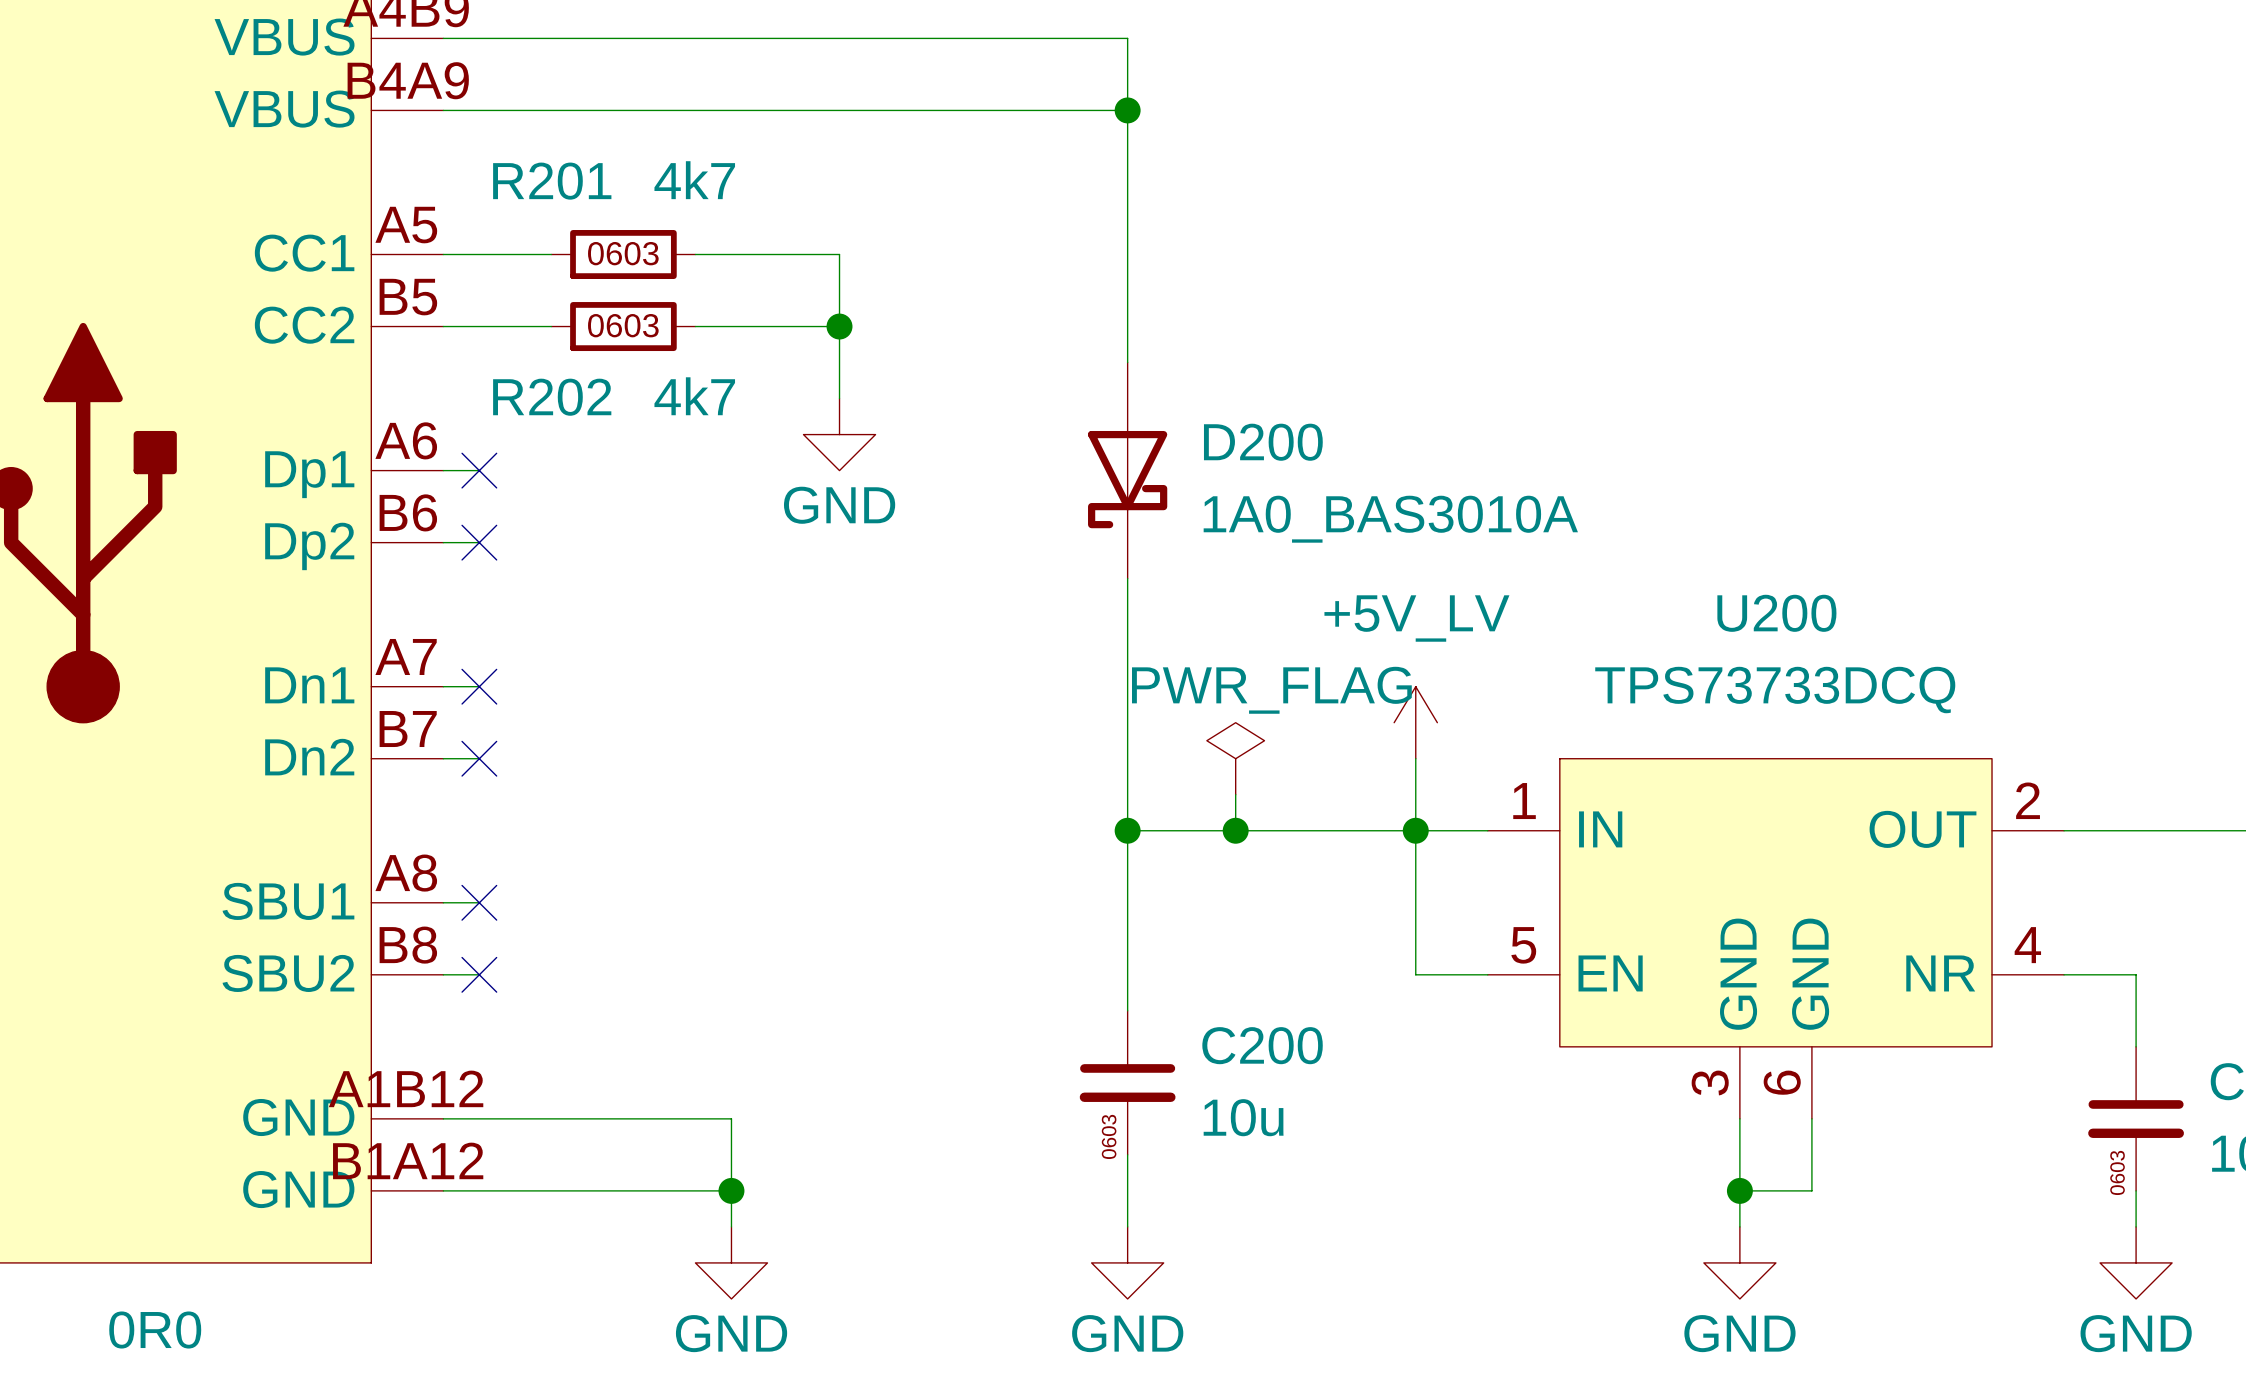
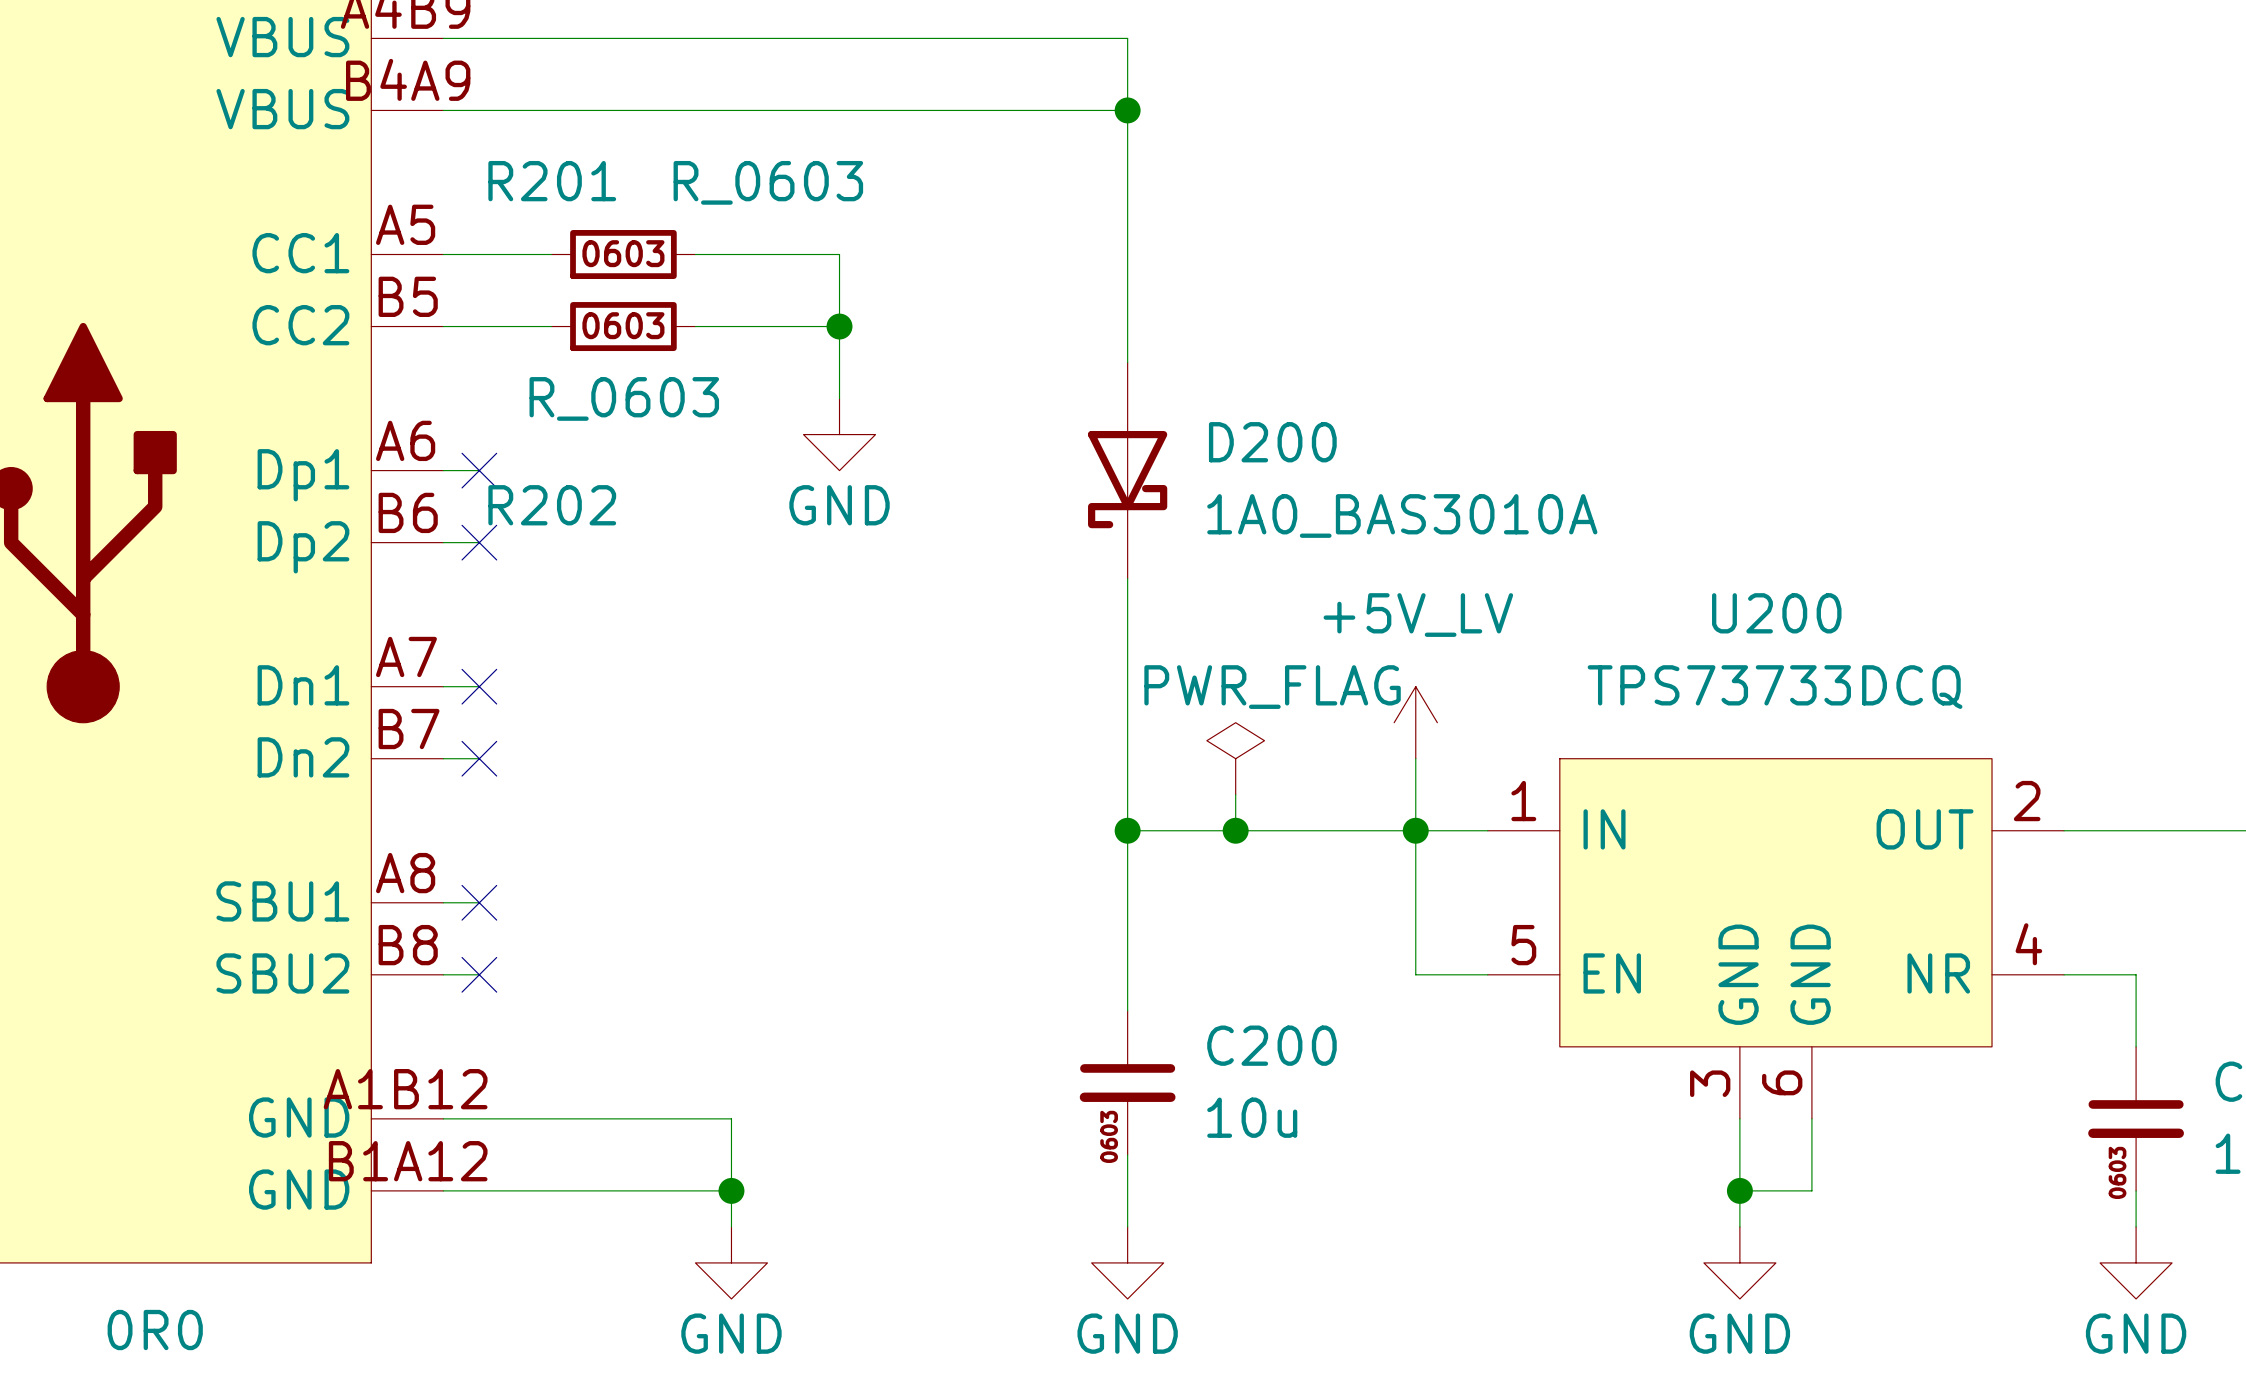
R201 value: 4k7 (694, 180) -> R_0603 (768, 182)
R202 value: 4k7 (694, 396) -> R_0603 (624, 398)
R202 name position: R202 (552, 397) -> R202 (552, 505)

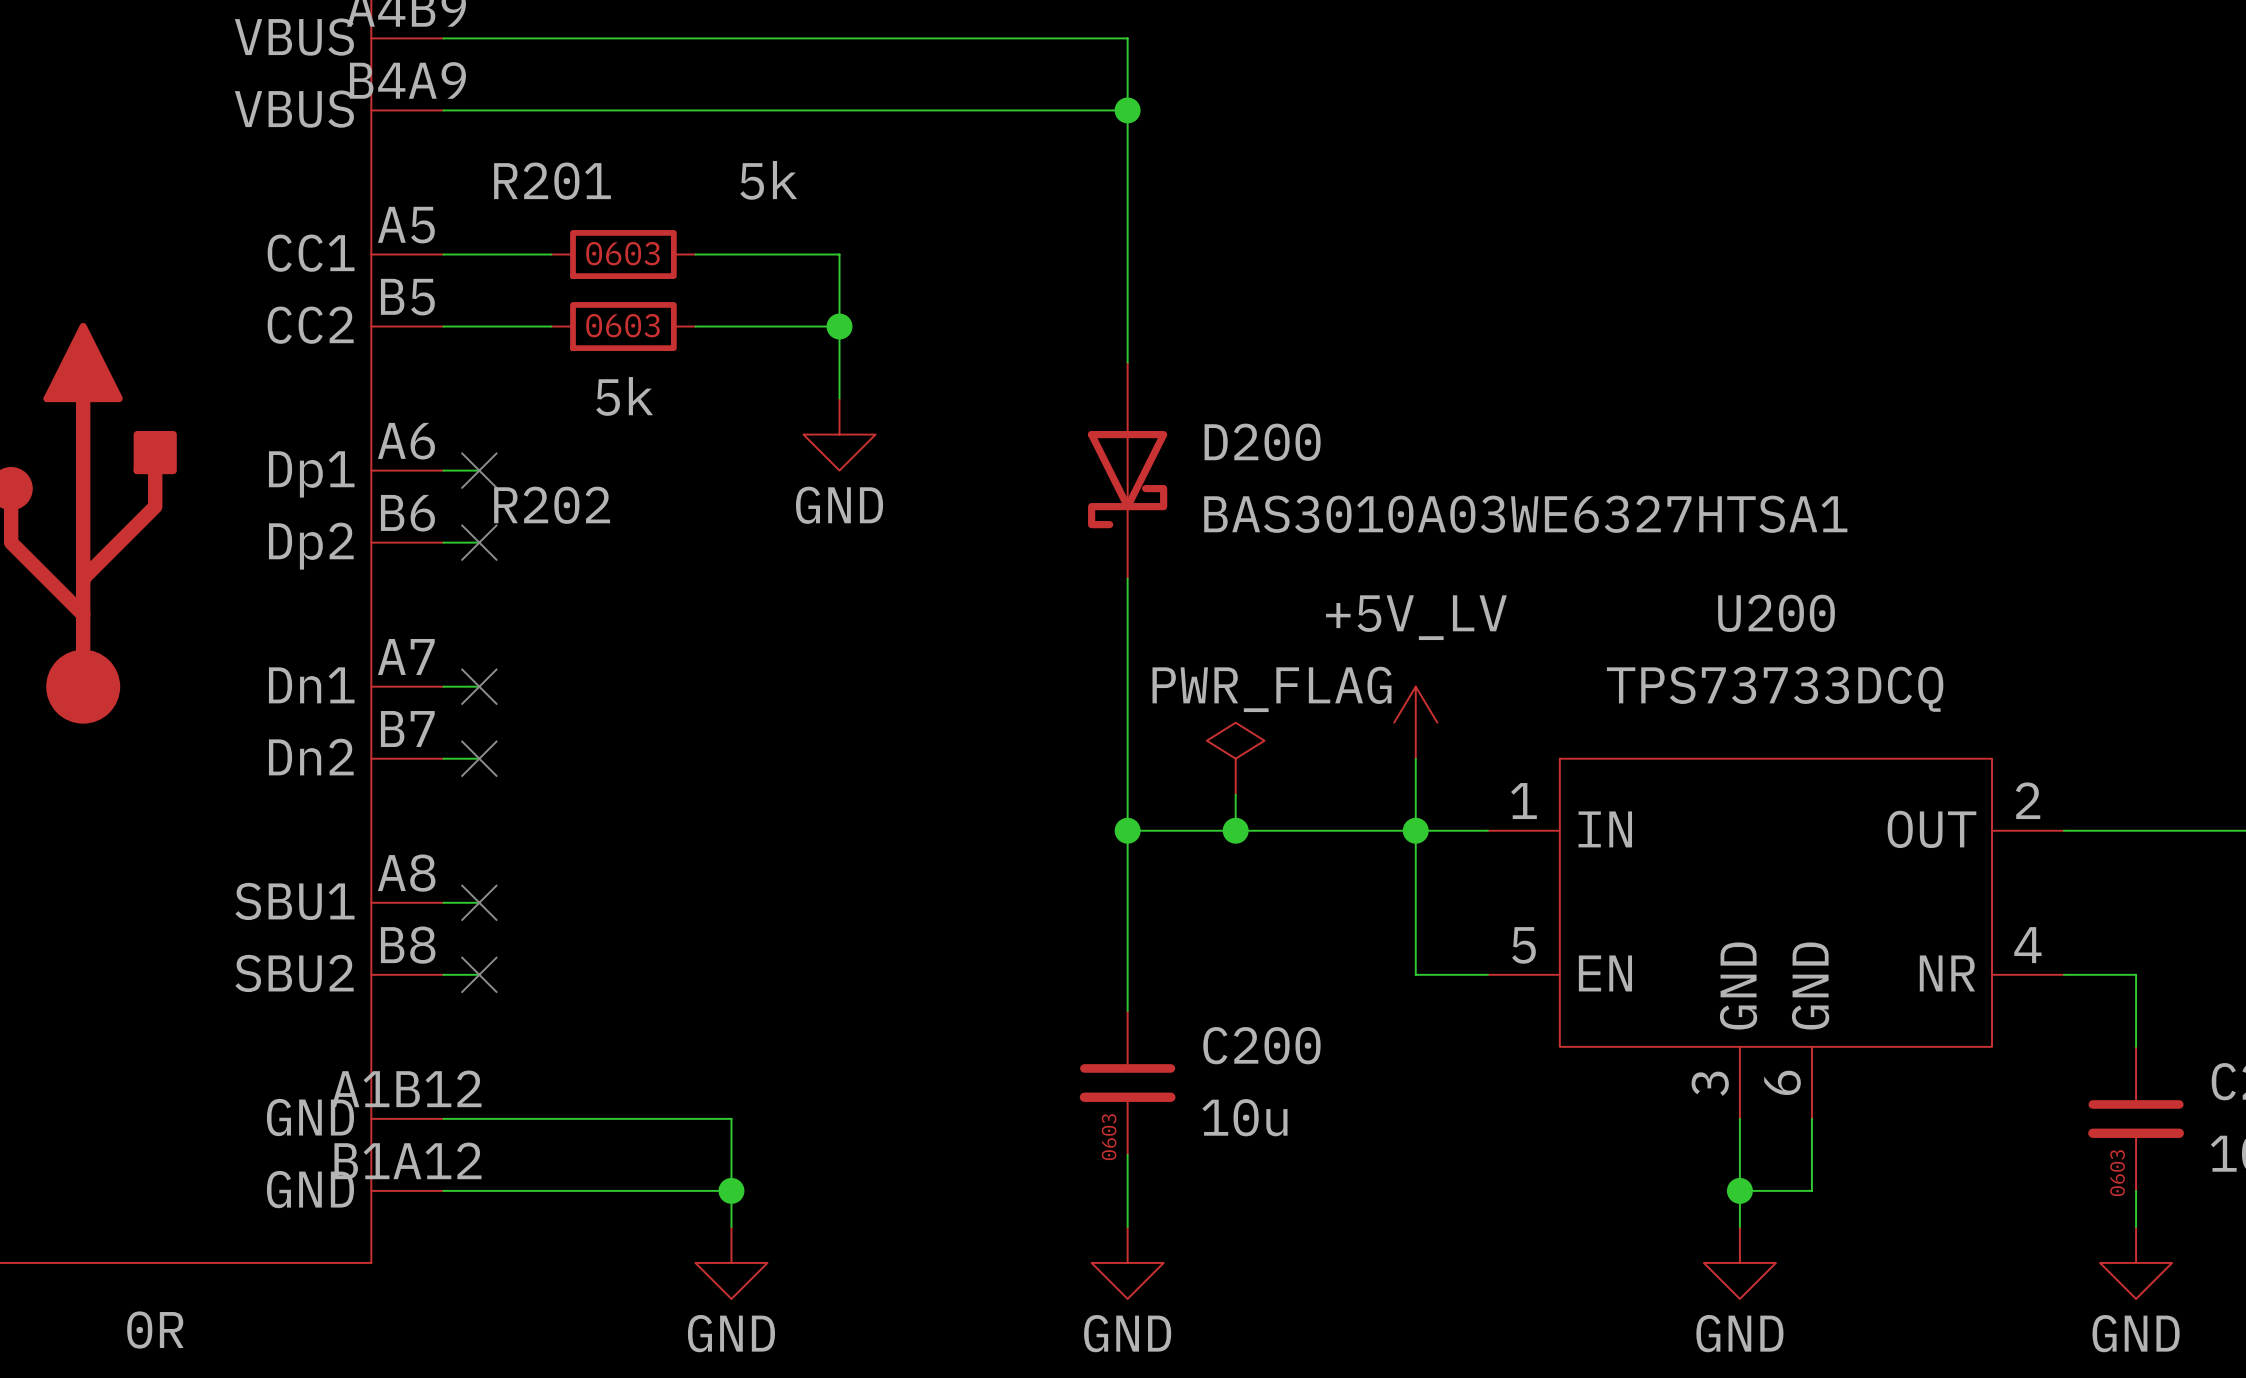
R201 value: R_0603 (768, 182) -> 5k (768, 180)
R202 value: R_0603 (624, 398) -> 5k (624, 396)
D200 value: 1A0_BAS3010A (1402, 515) -> BAS3010A03WE6327HTSA1 (1525, 514)
part value: 0R0 (155, 1330) -> 0R (155, 1330)

